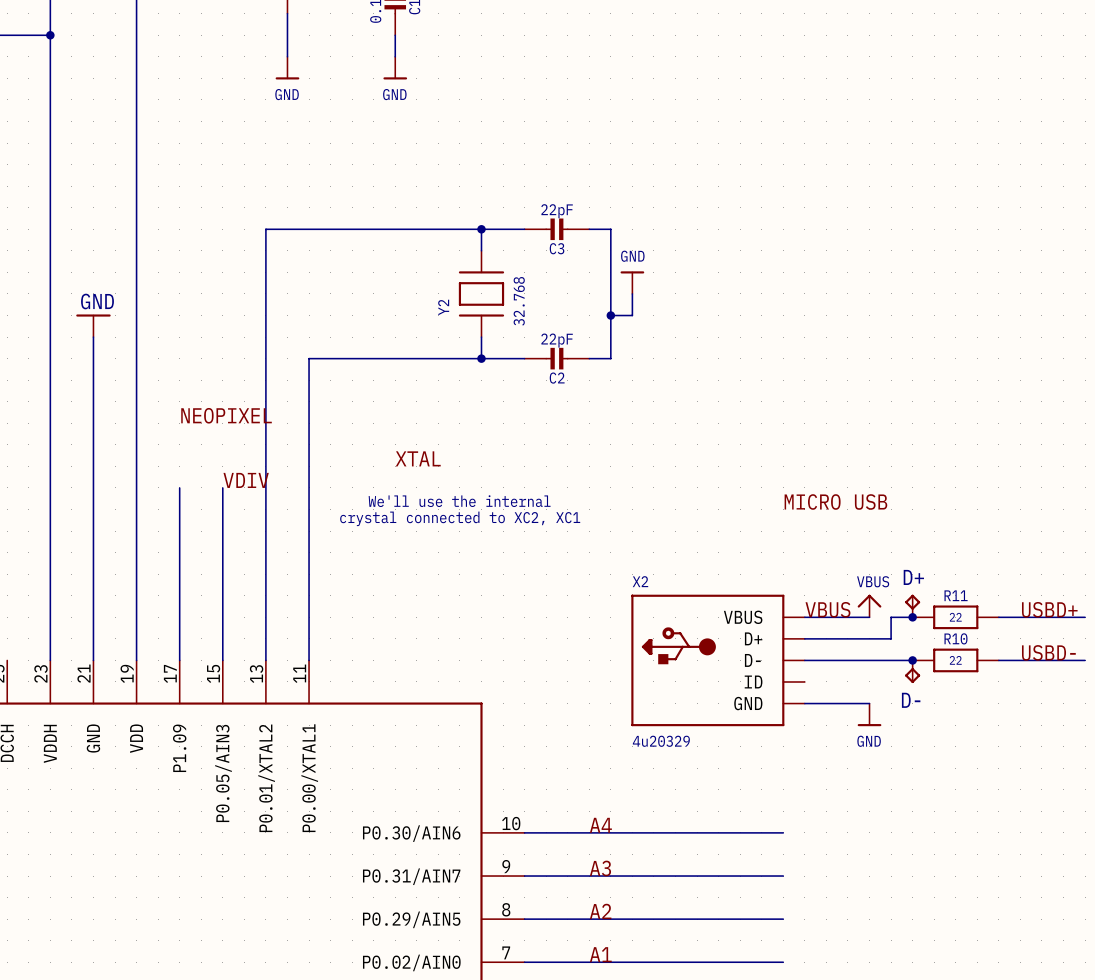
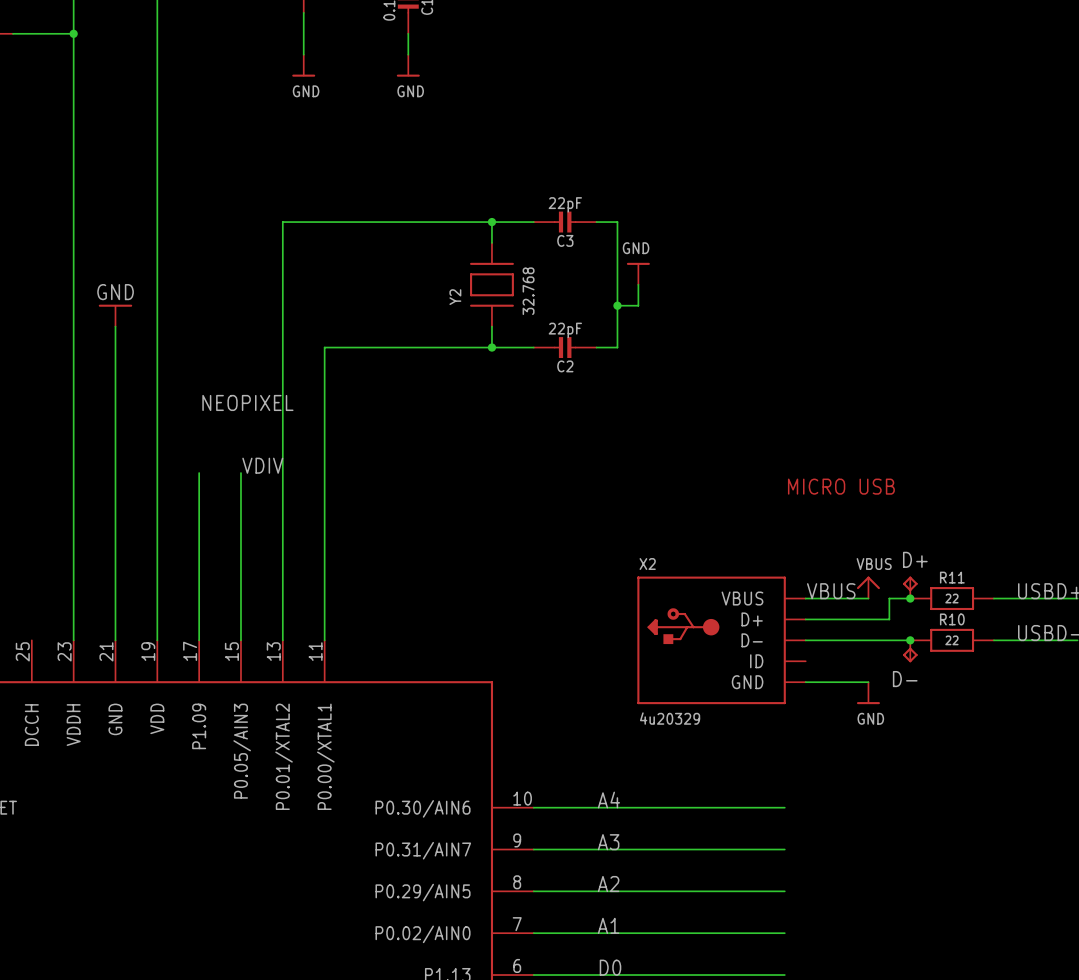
text: XTAL (418, 458) -> none
text: We'll use the internal (459, 501) -> none
text: crystal connected to XC2, XC1 (460, 518) -> none

